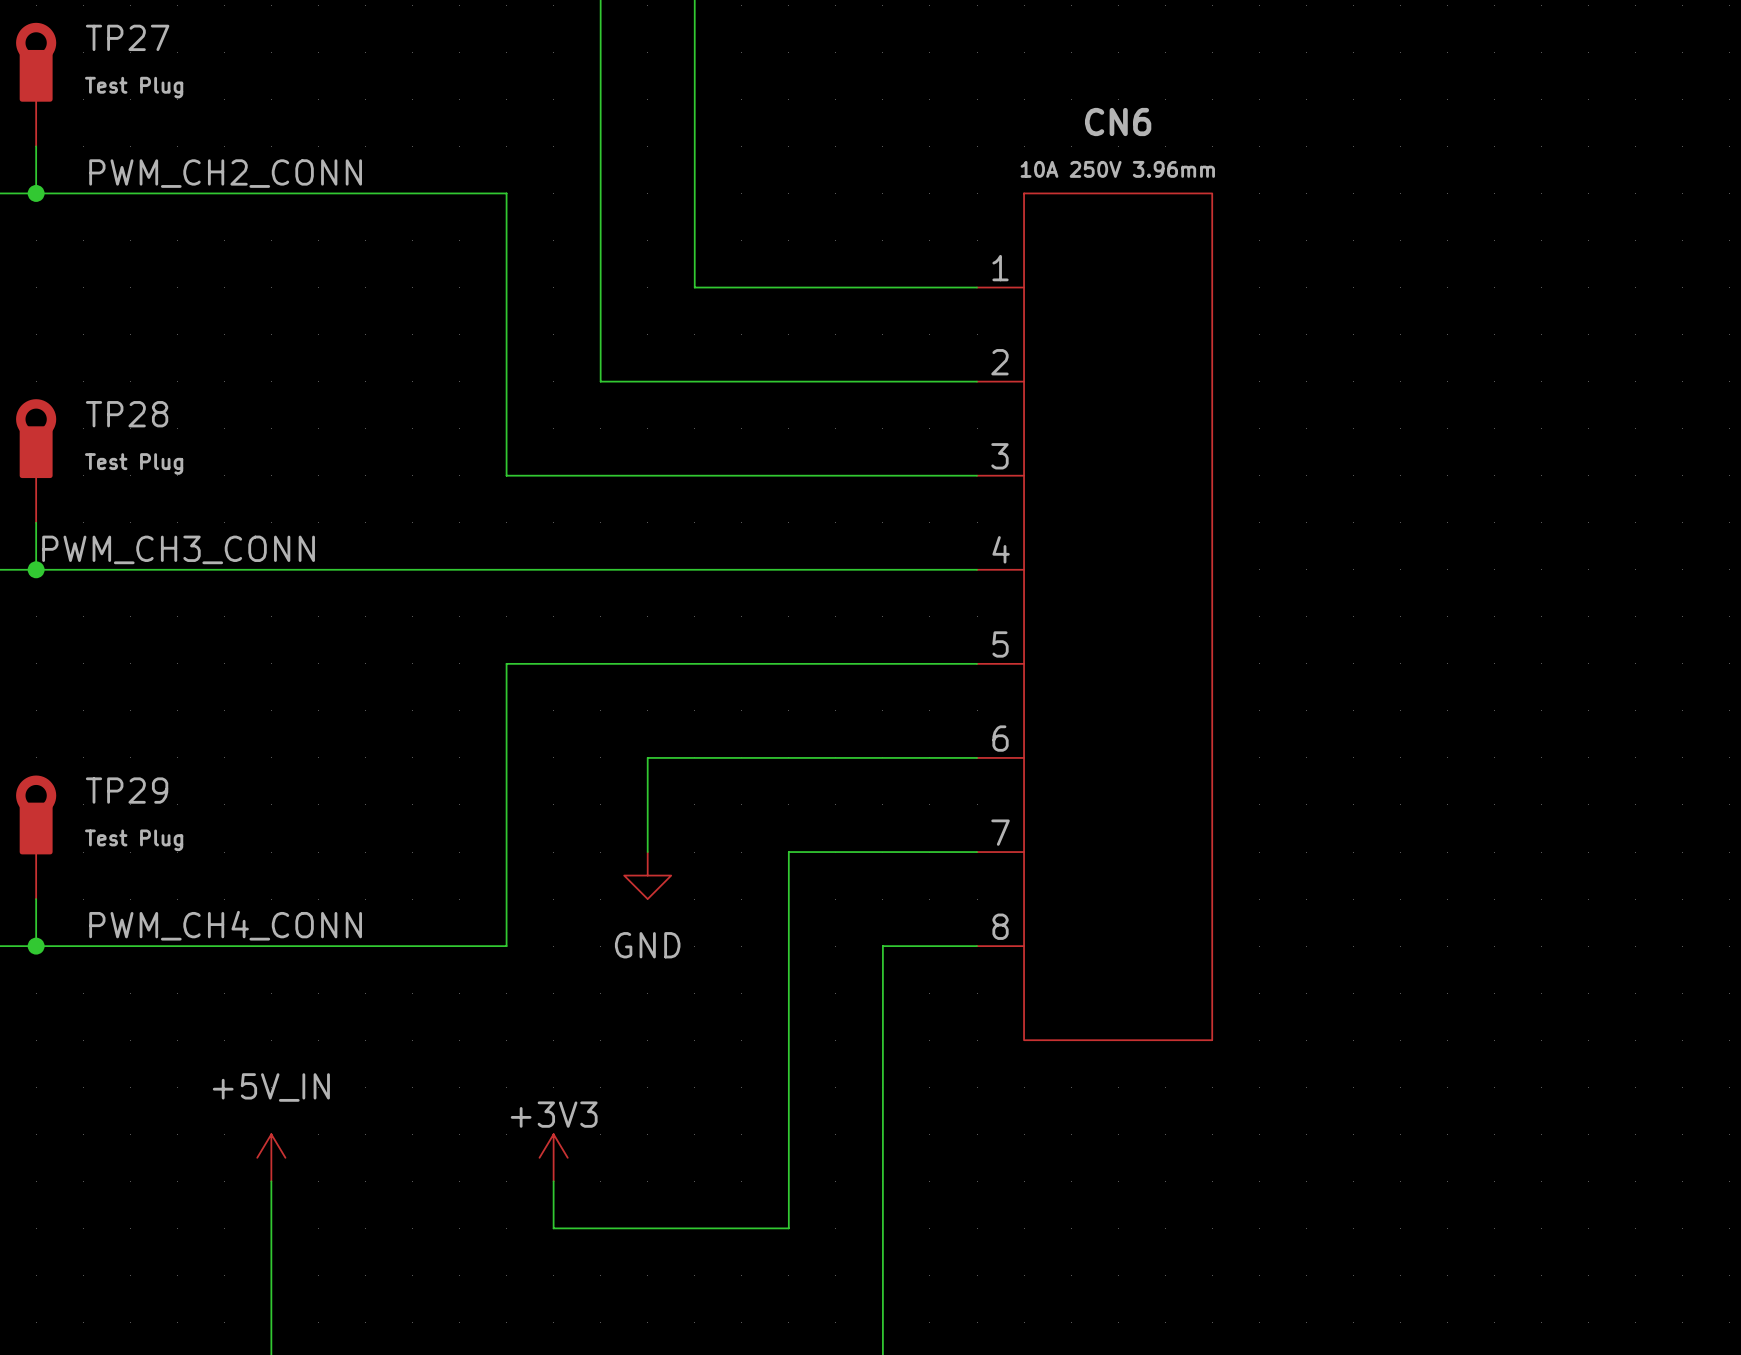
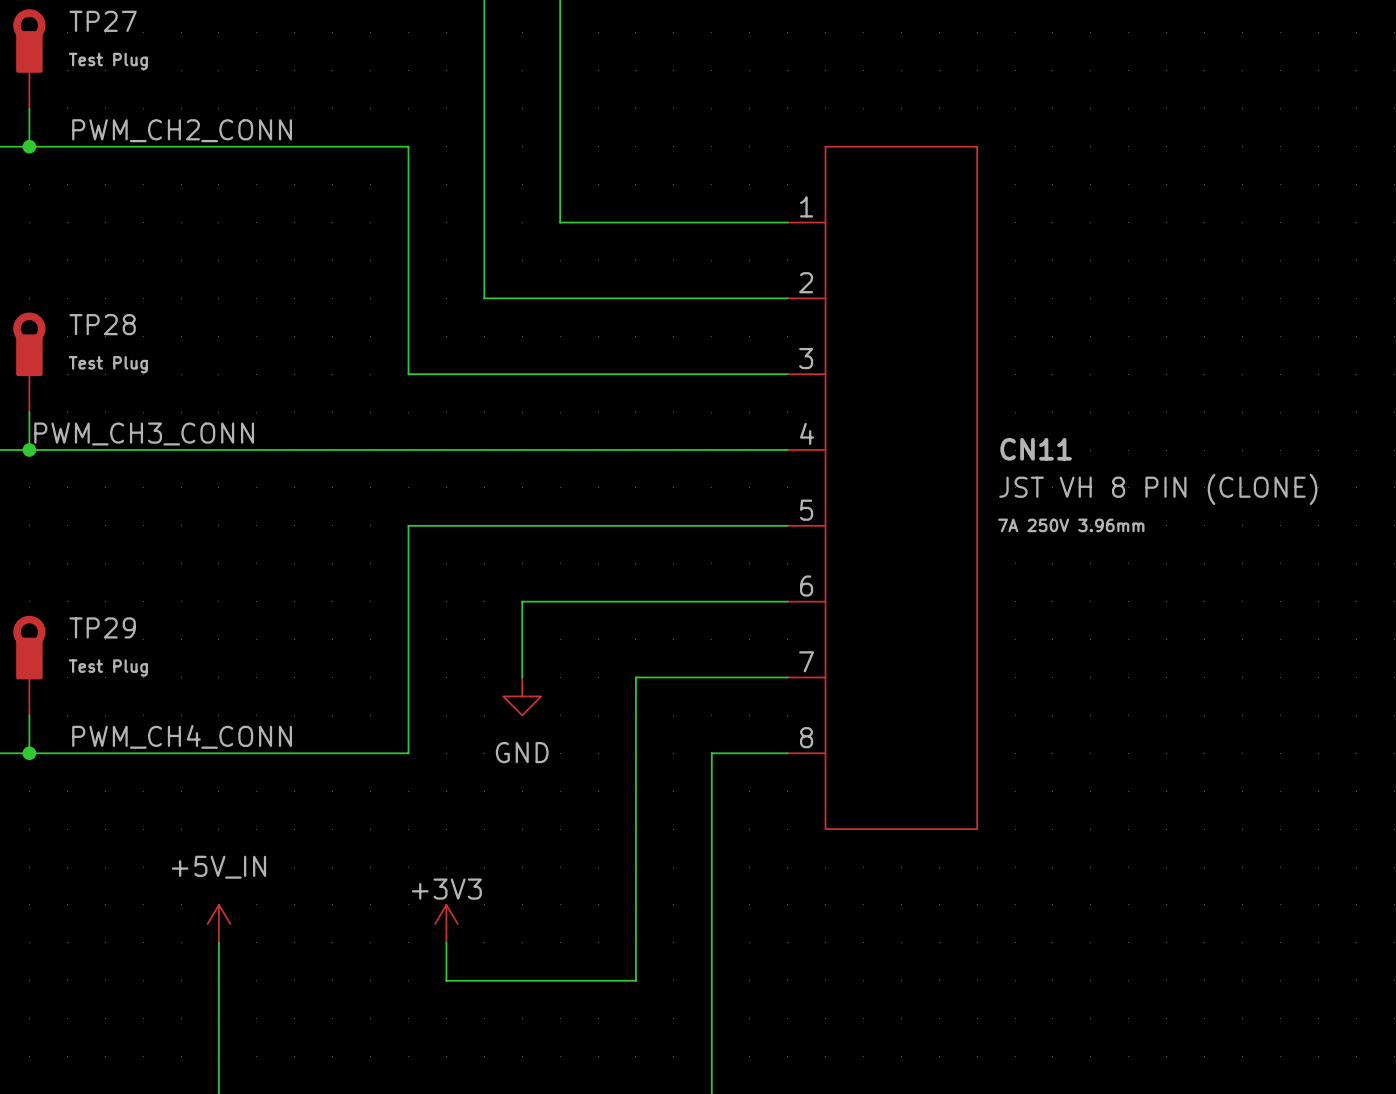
CN6 name: CN6 (1118, 121) -> CN11 (1036, 449)
CN6 text: 10A 250V 3.96mm (1117, 169) -> 7A 250V 3.96mm (1071, 525)
CN6 value: none -> JST VH 8 PIN (CLONE) (1158, 489)

